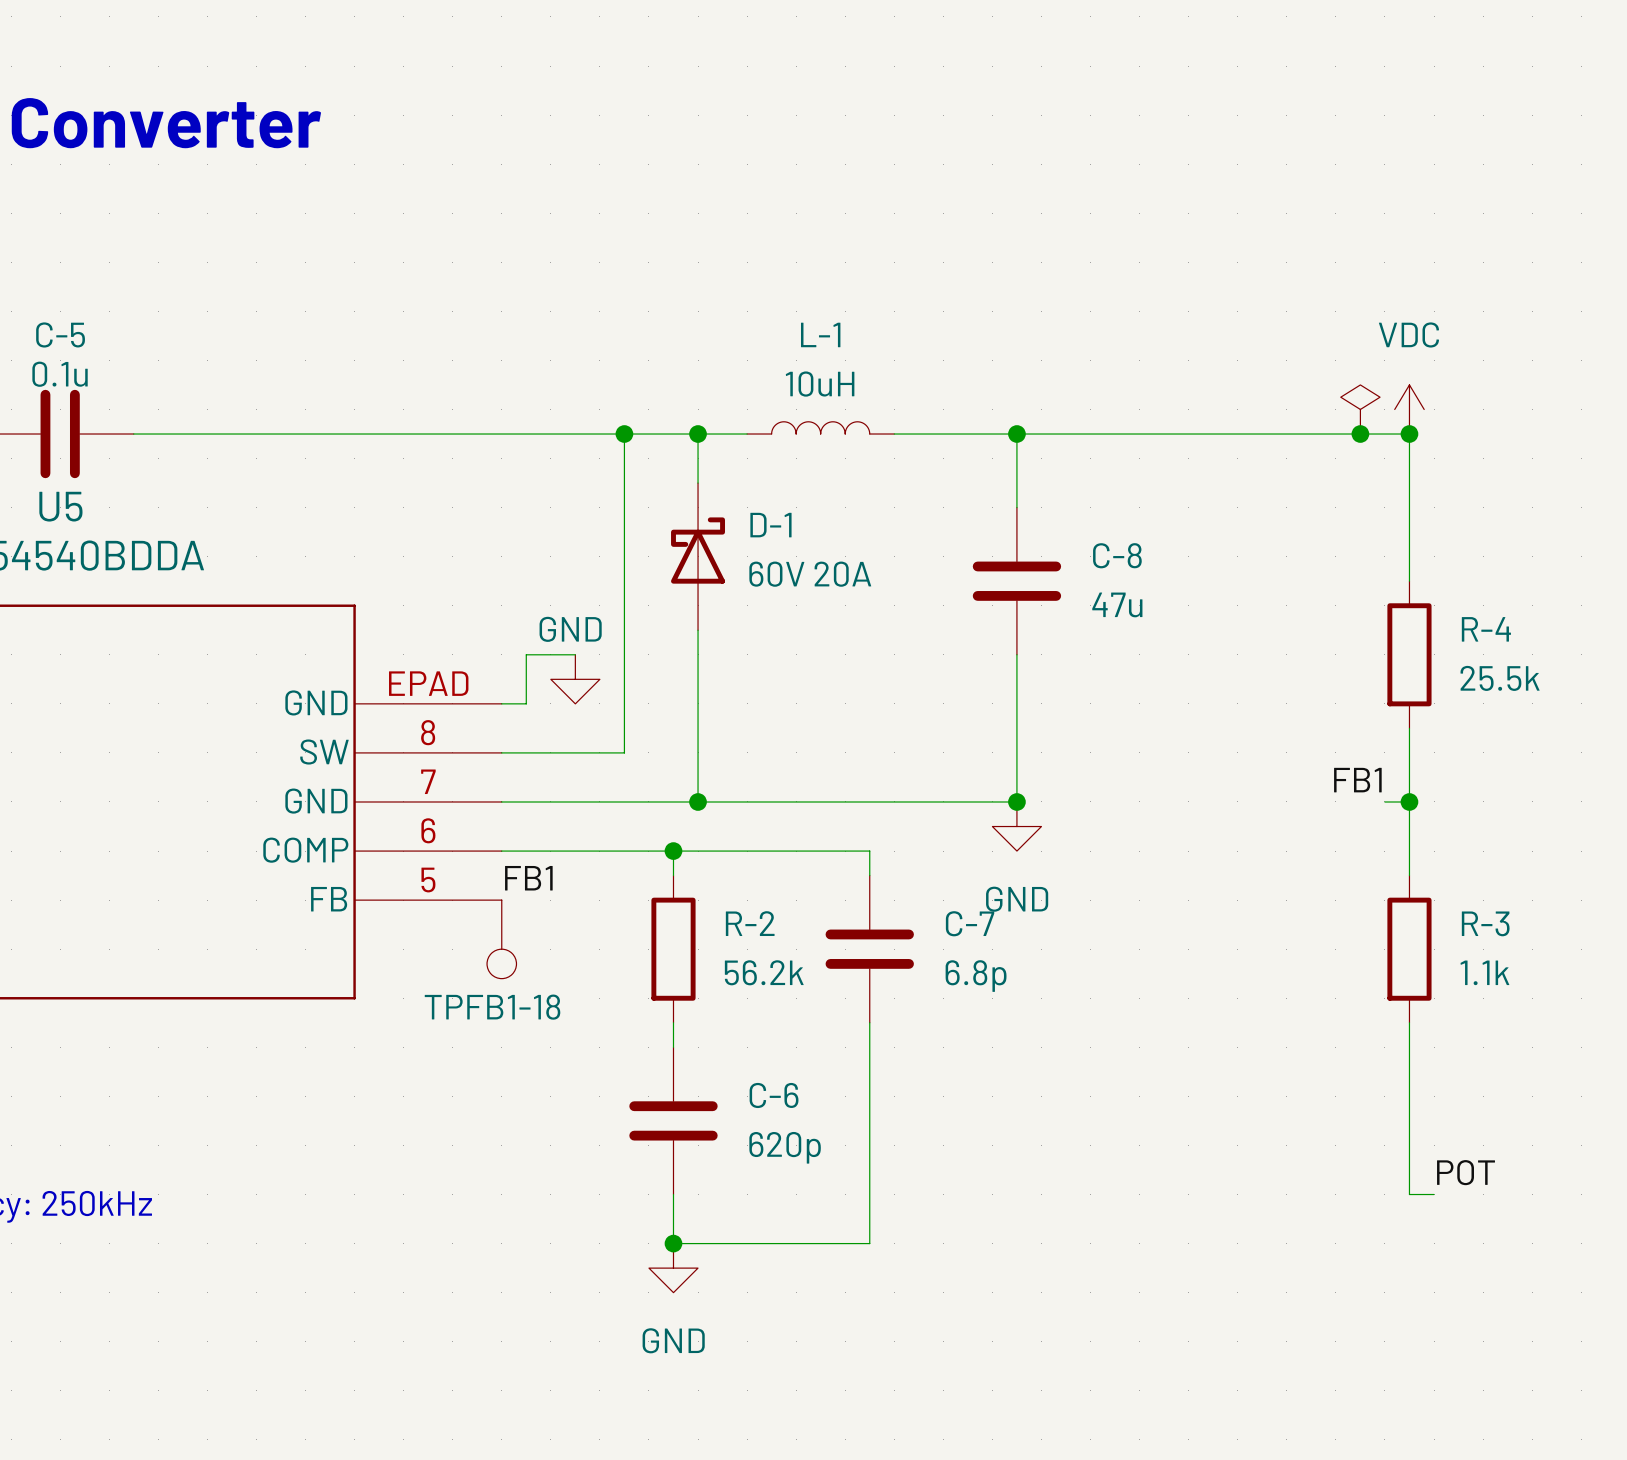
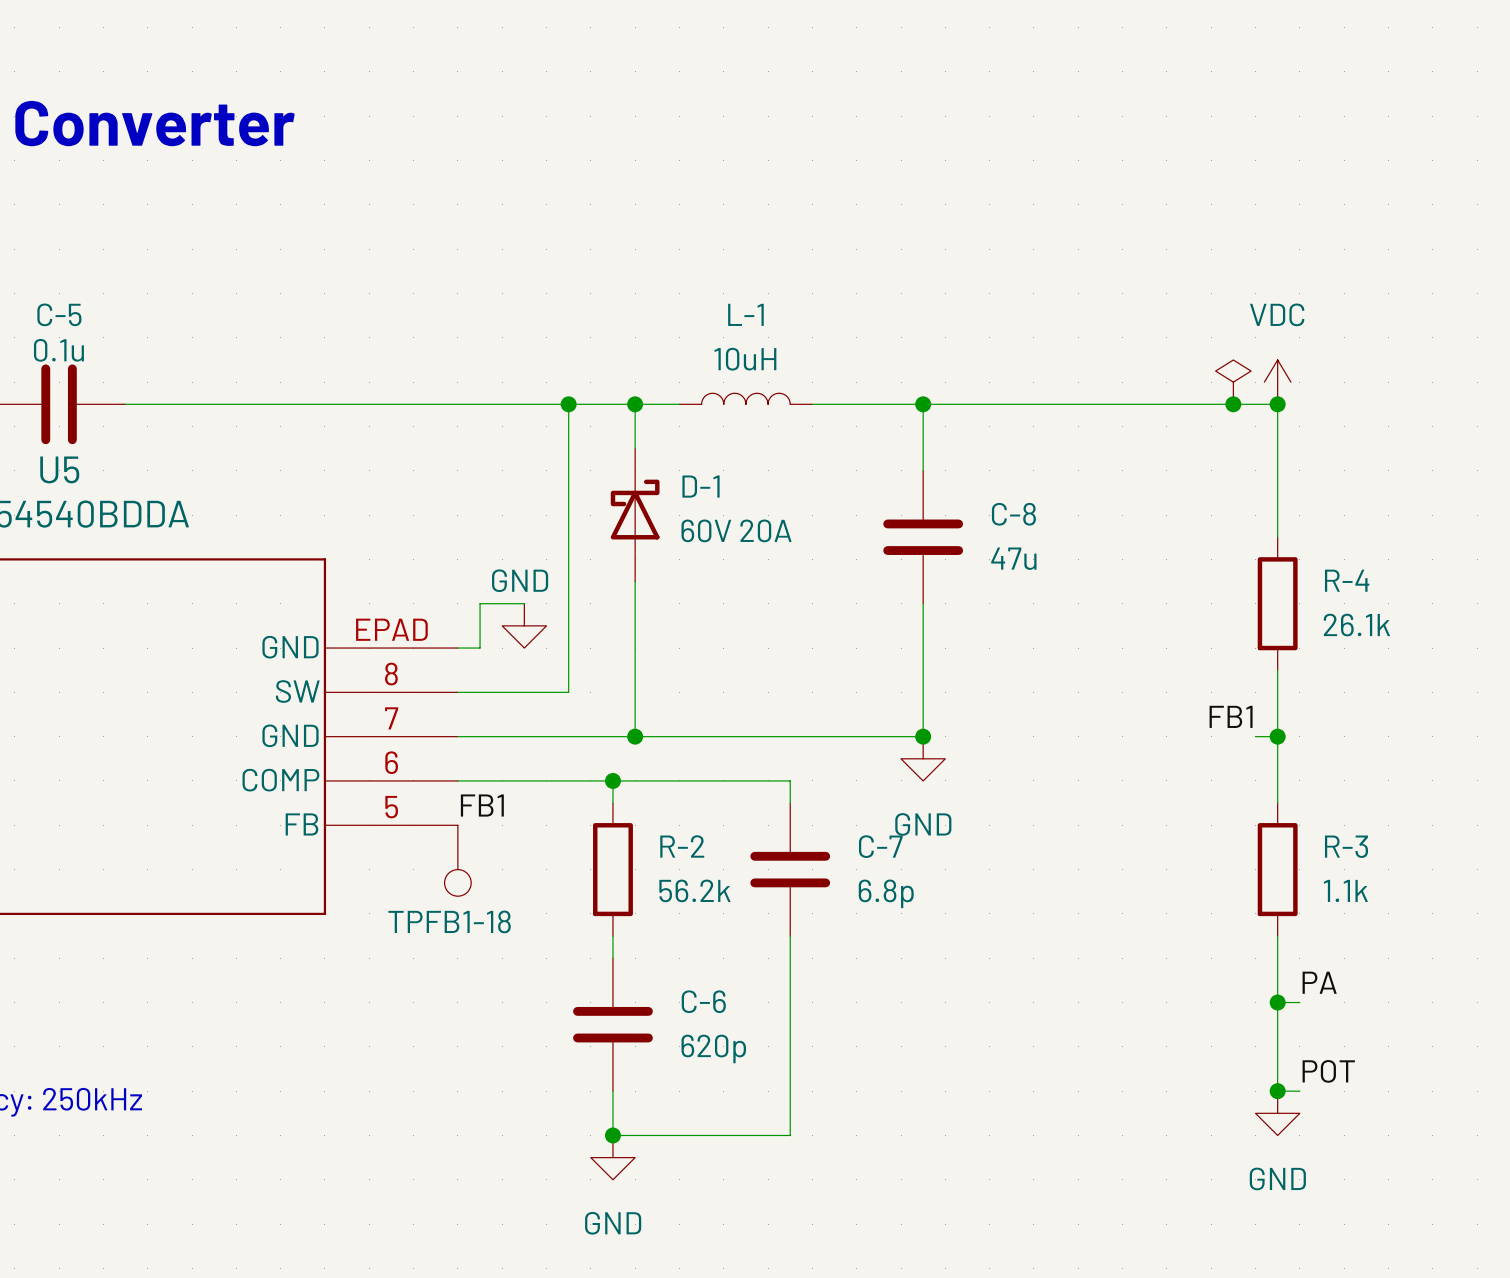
R-4 value: 25.5k (1500, 678) -> 26.1k (1356, 625)
label: none -> PA (1319, 982)
wire: none -> (1277, 1002) (1299, 1002)
junction: none -> (1277, 1002)
junction: none -> (1277, 1091)
power symbol: none -> GND (1277, 1113)

